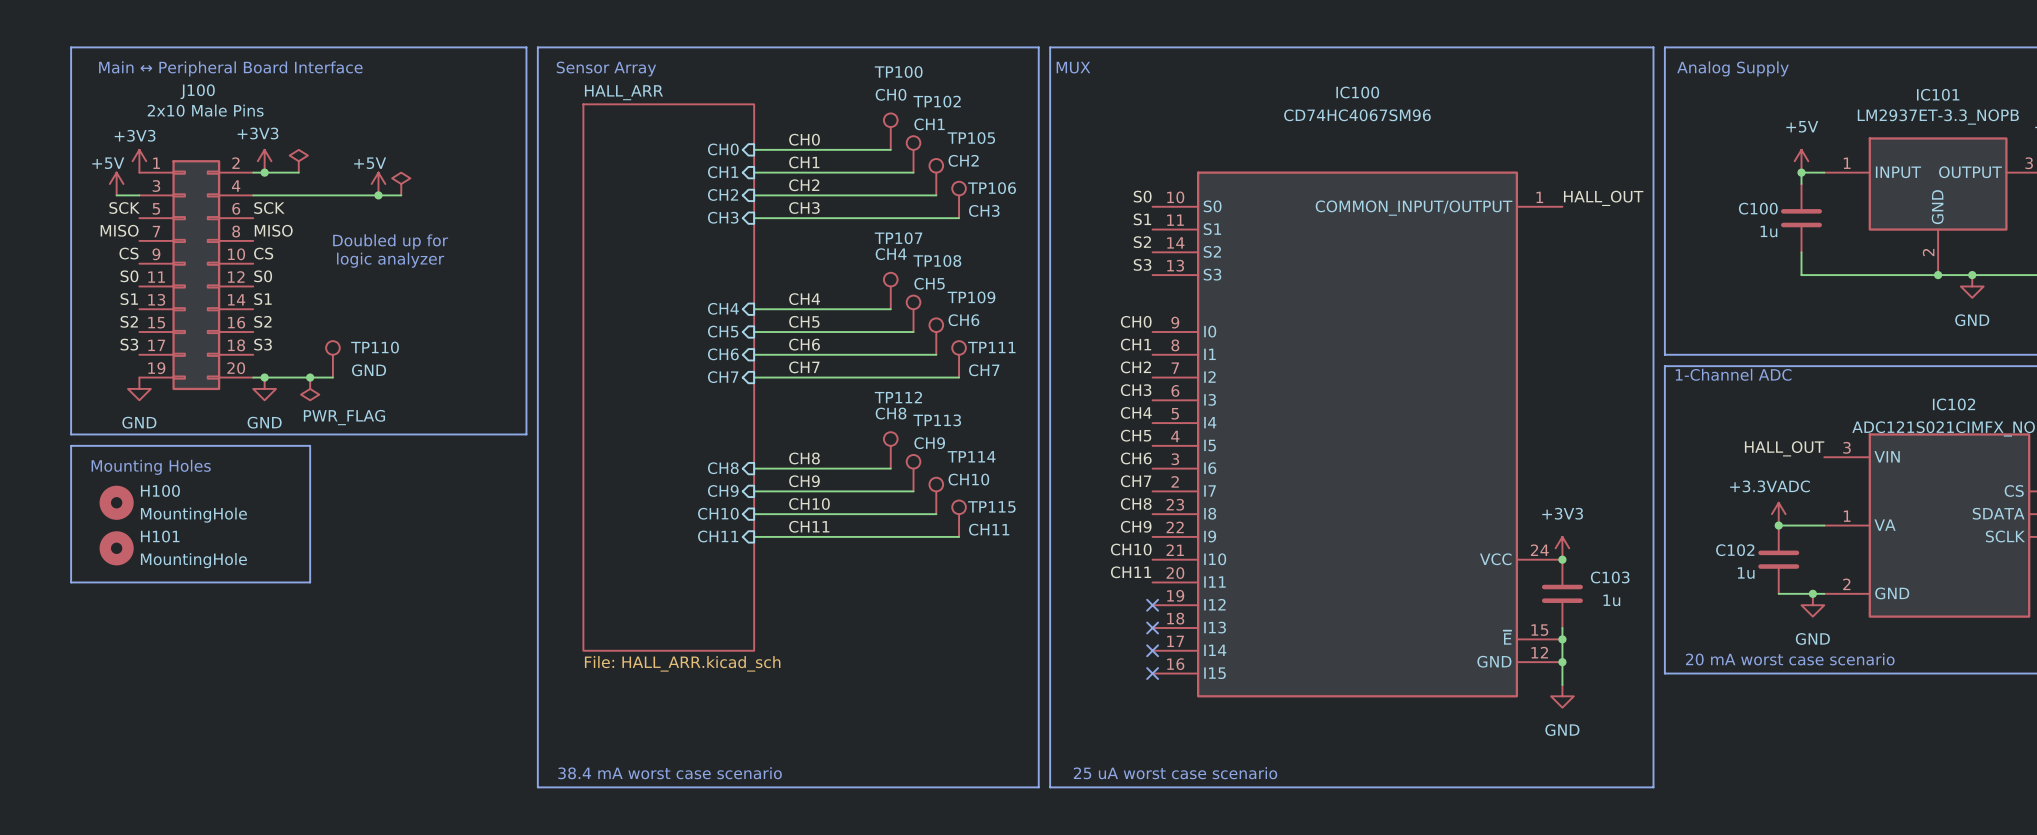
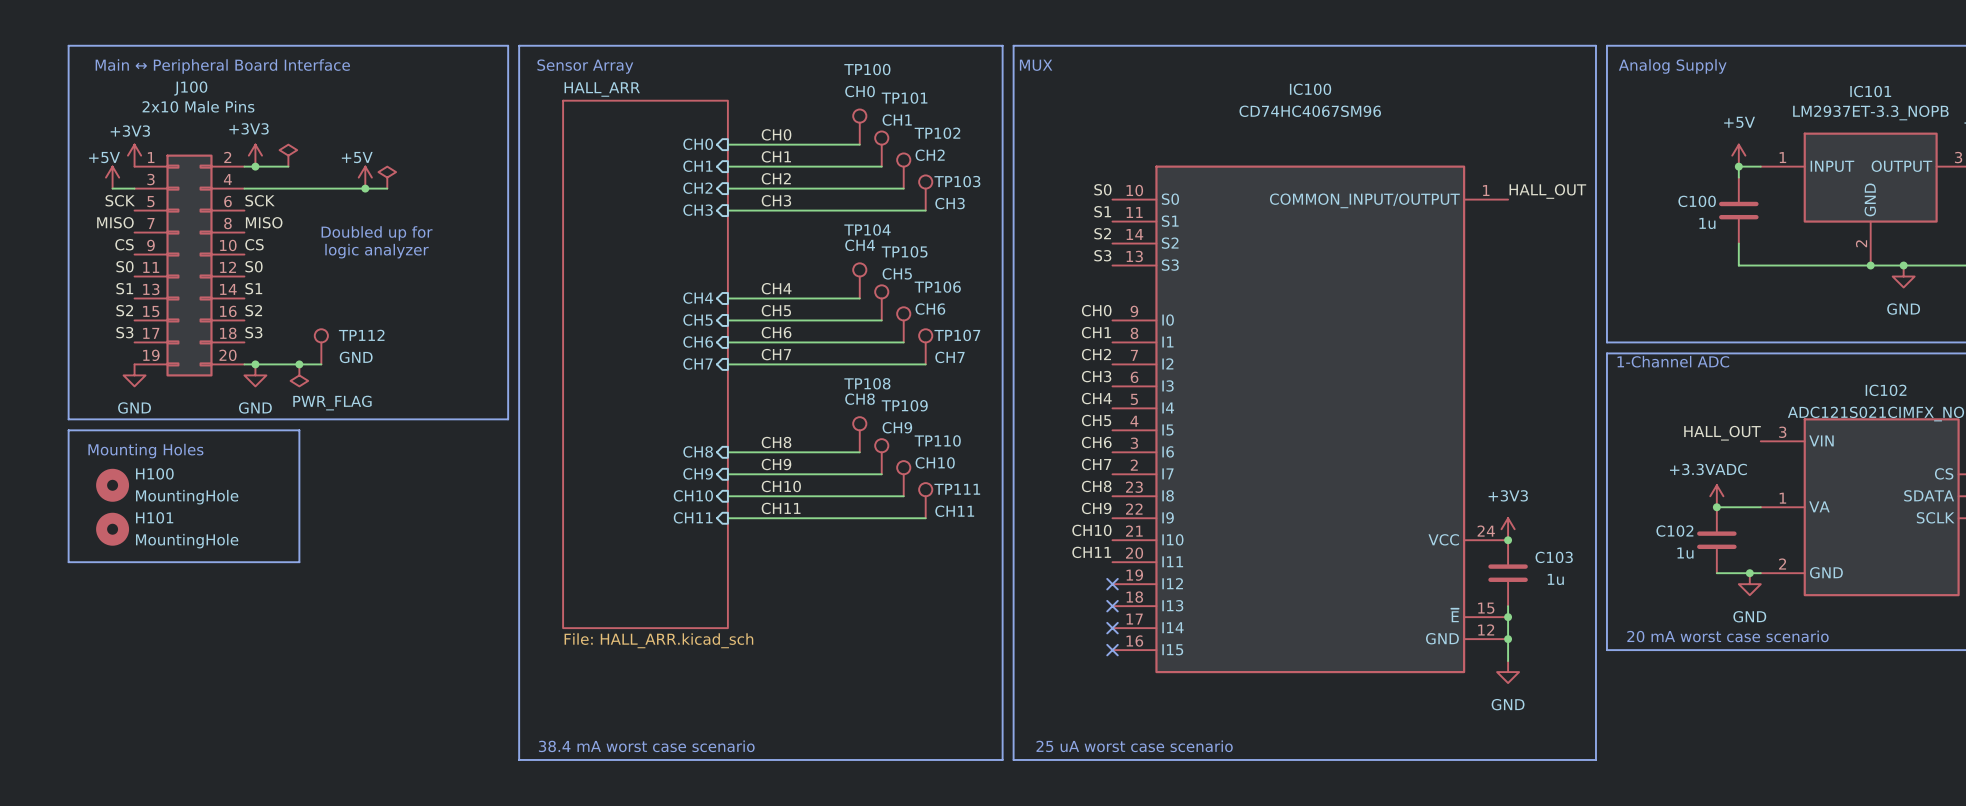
TP102 name: TP102 (937, 101) -> TP101 (904, 98)
TP105 name: TP105 (971, 138) -> TP102 (937, 133)
TP106 name: TP106 (992, 188) -> TP103 (957, 181)
TP107 name: TP107 (898, 238) -> TP104 (867, 229)
TP108 name: TP108 (937, 261) -> TP105 (904, 251)
TP109 name: TP109 (971, 297) -> TP106 (937, 287)
TP110 name: TP110 (374, 347) -> TP112 (361, 335)
TP111 name: TP111 (991, 347) -> TP107 (957, 335)
TP112 name: TP112 (898, 397) -> TP108 (867, 383)
TP113 name: TP113 (937, 420) -> TP109 (904, 405)
TP114 name: TP114 (971, 456) -> TP110 (937, 440)
TP115 name: TP115 (991, 507) -> TP111 (957, 489)

